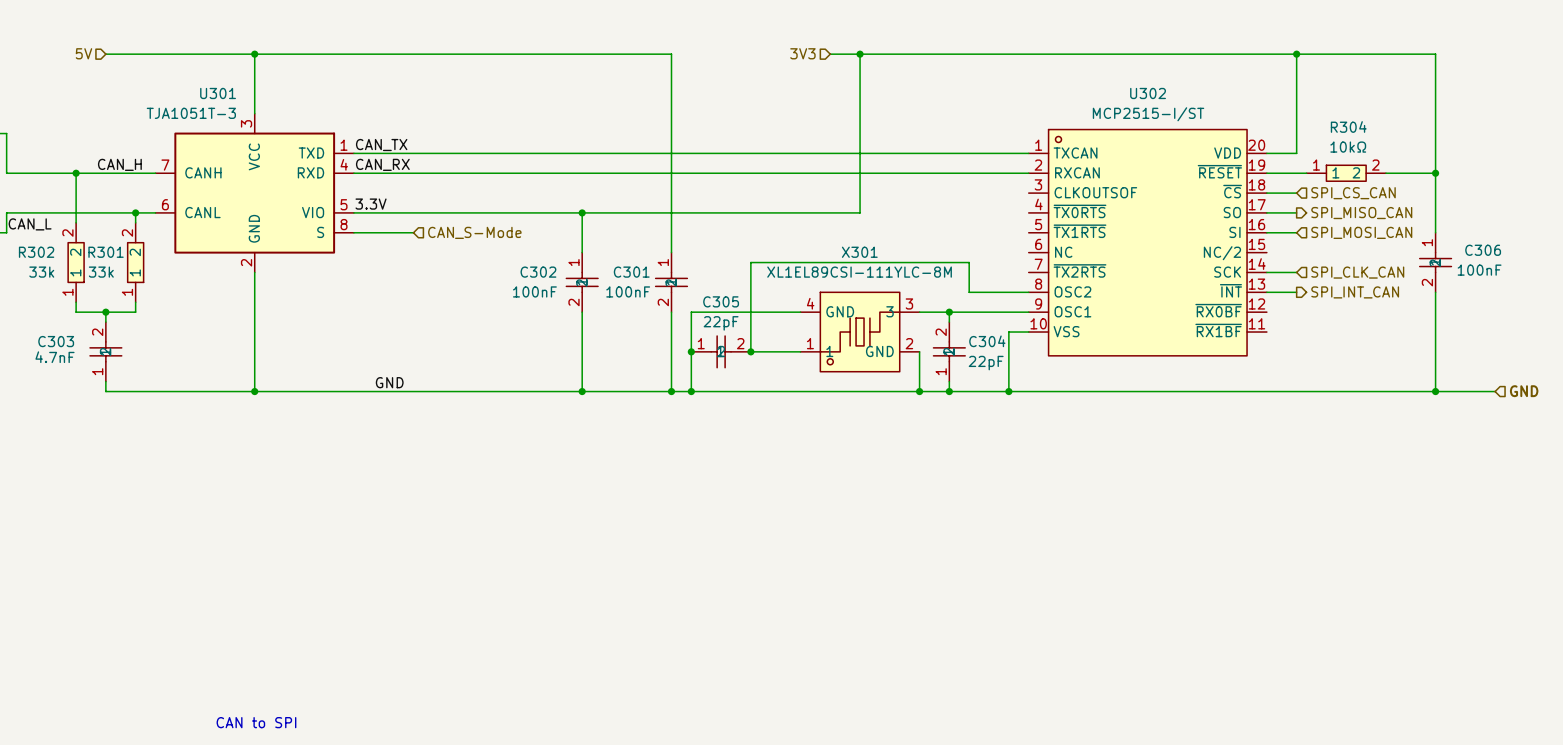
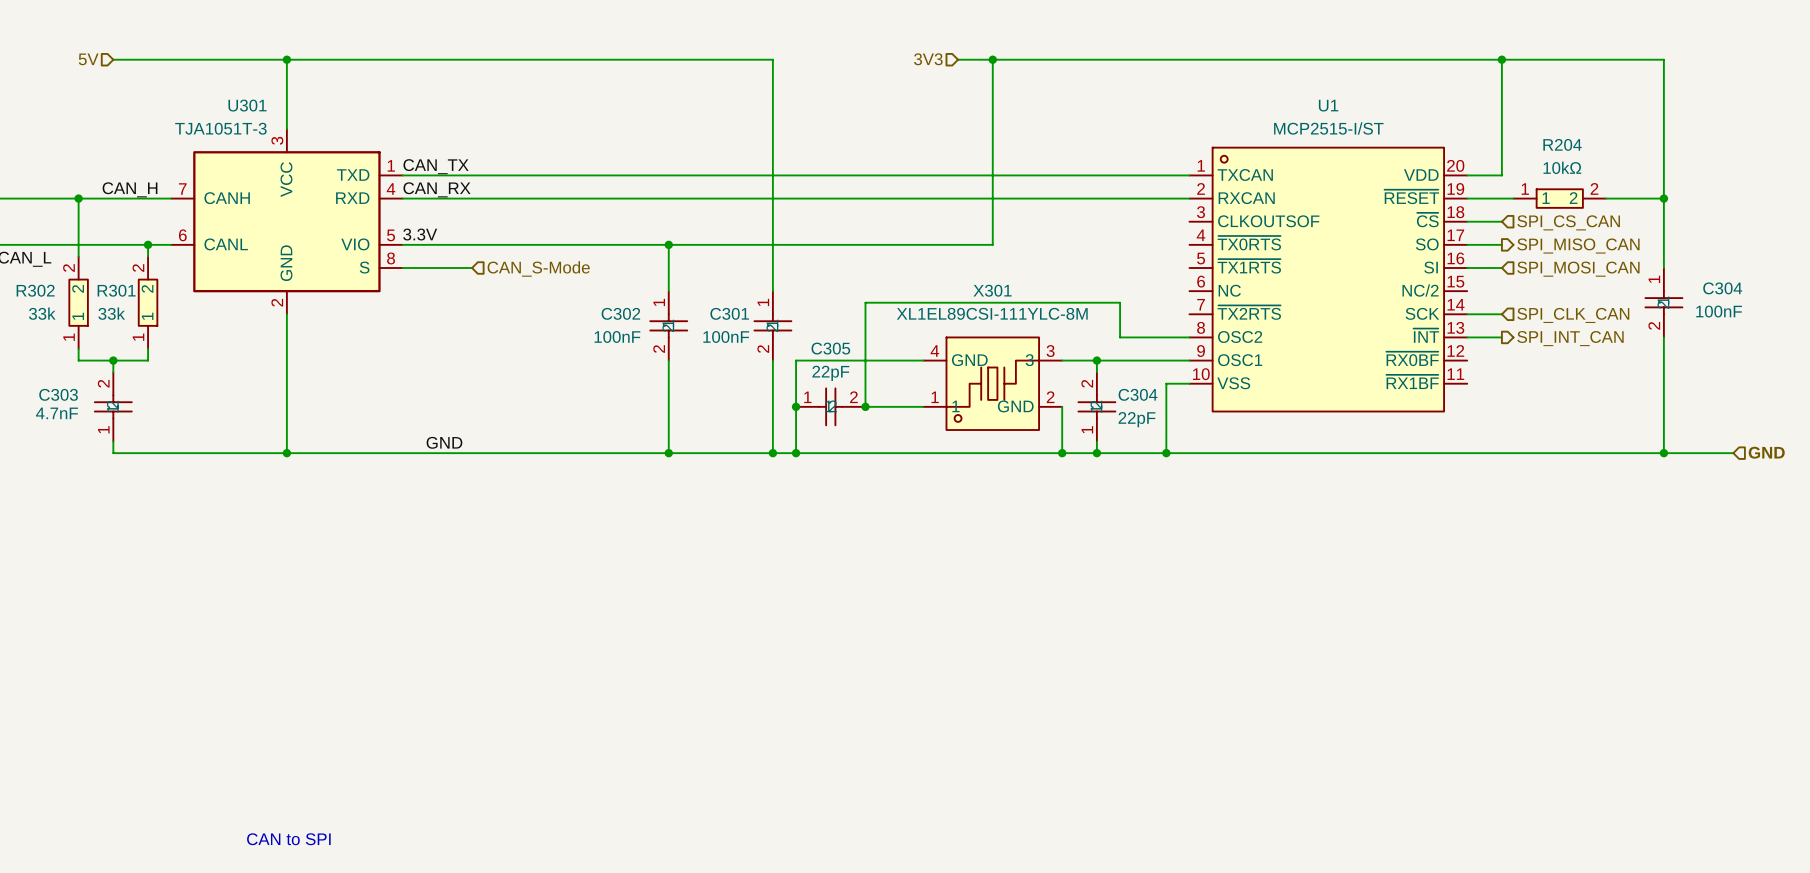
U302 name: U302 (1148, 93) -> U1 (1328, 105)
R304 name: R304 (1348, 126) -> R204 (1562, 144)
C306 name: C306 (1483, 250) -> C304 (1722, 288)

